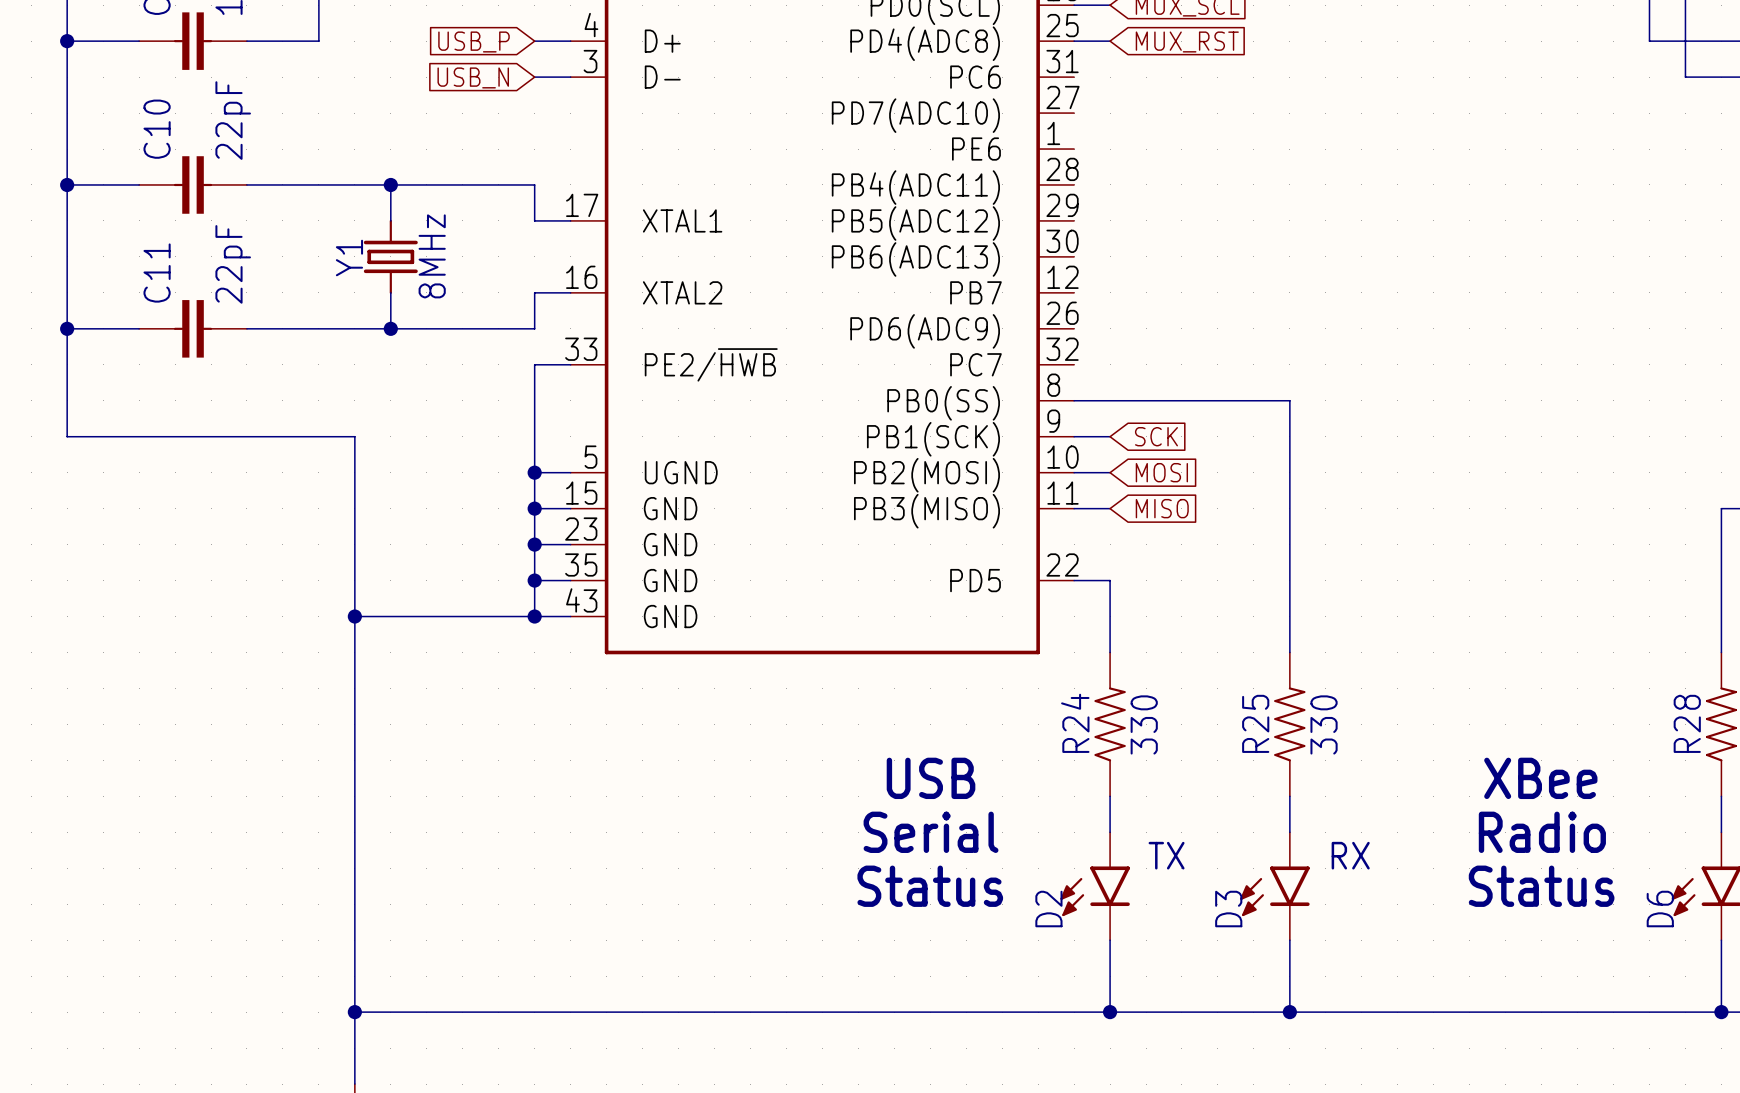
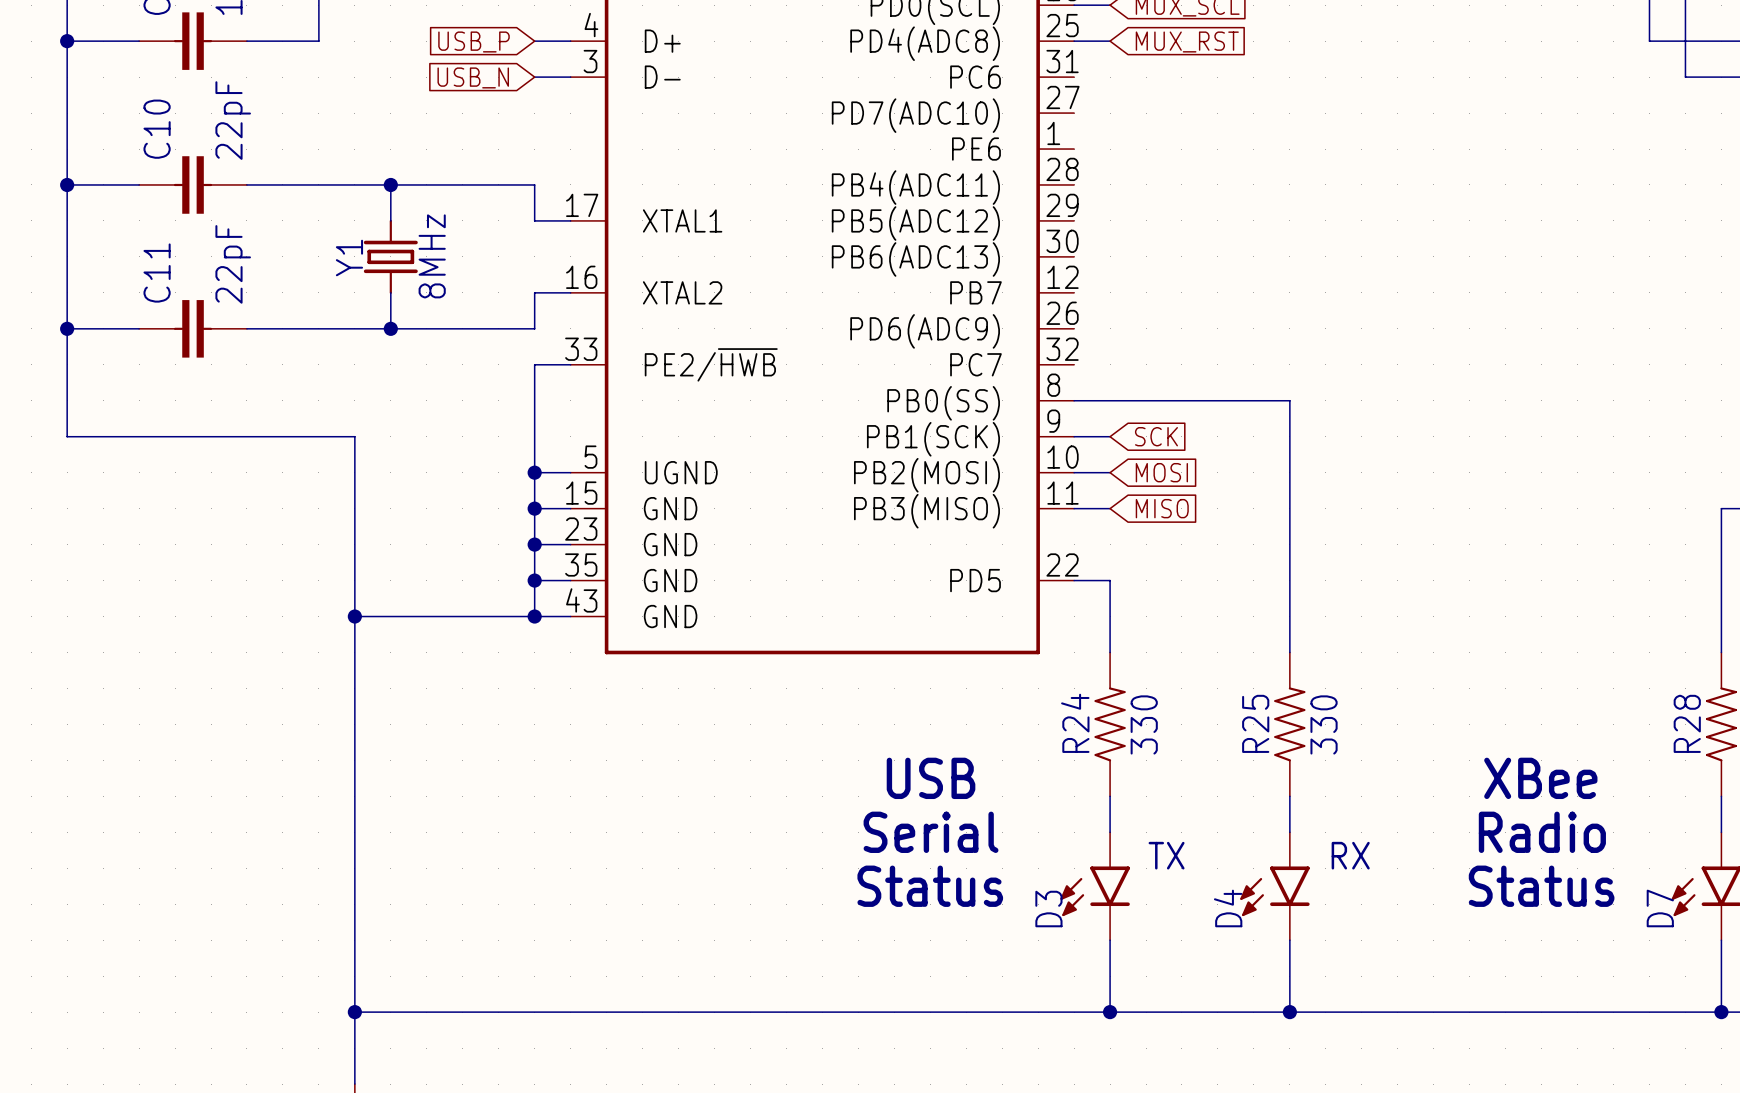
D2 name: D2 (1048, 909) -> D3 (1048, 909)
D3 name: D3 (1228, 909) -> D4 (1228, 908)
D6 name: D6 (1660, 909) -> D7 (1660, 908)

